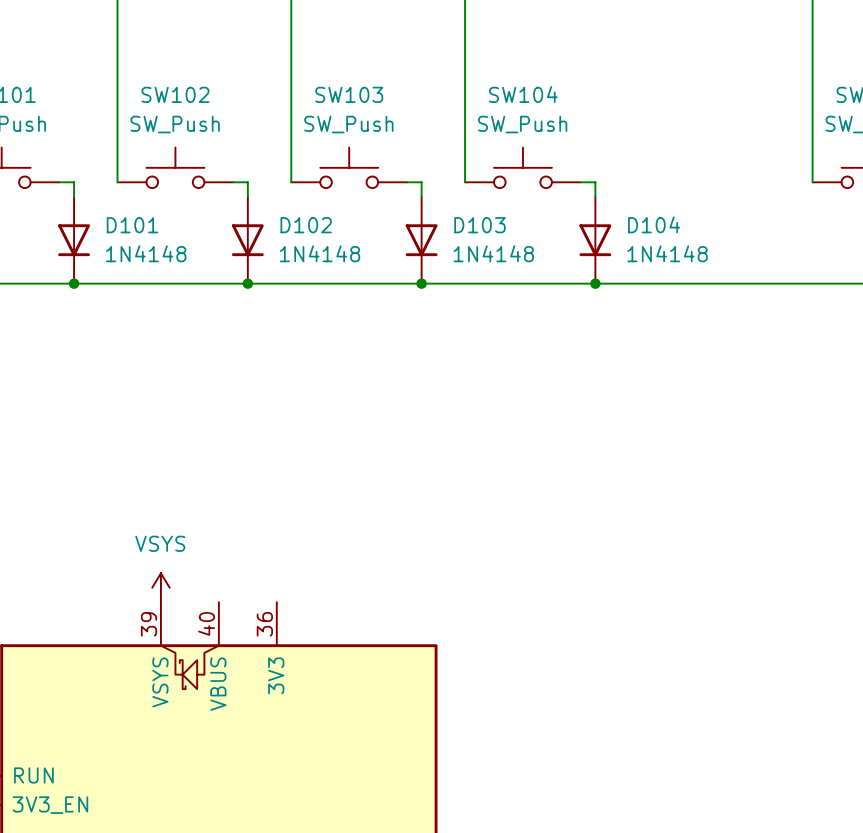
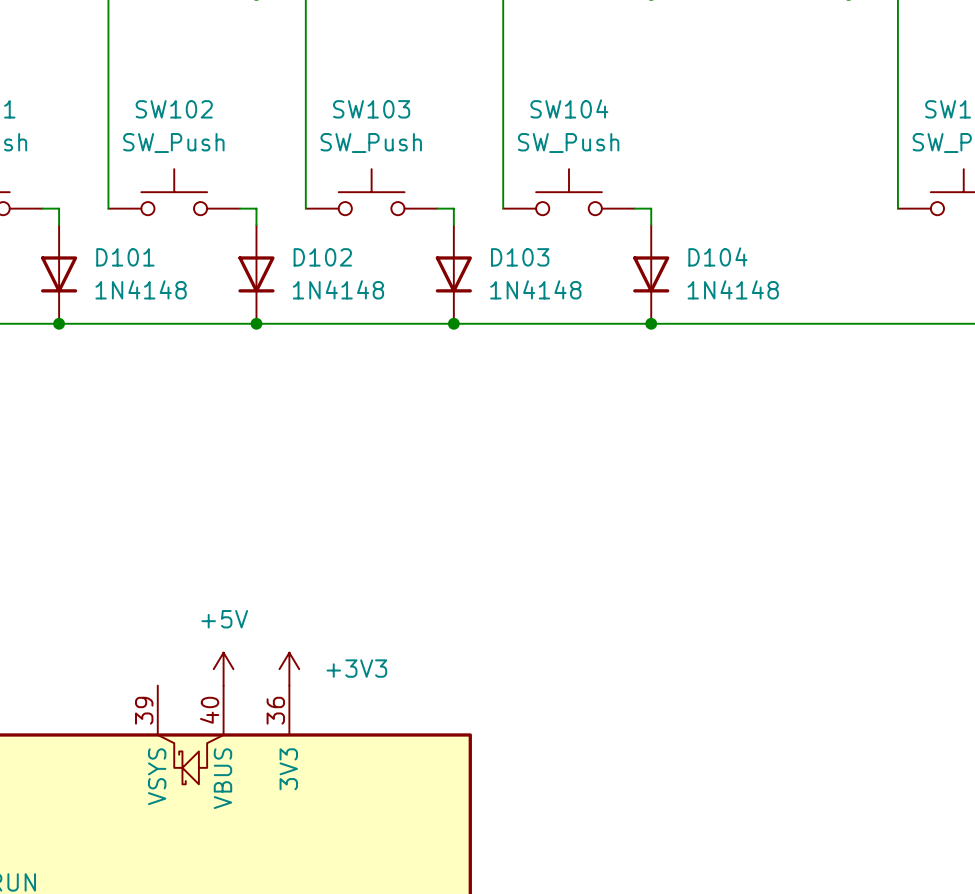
power symbol: VSYS (160, 587) -> none
power symbol: none -> +5V (223, 669)
power symbol: none -> +3V3 (289, 669)

